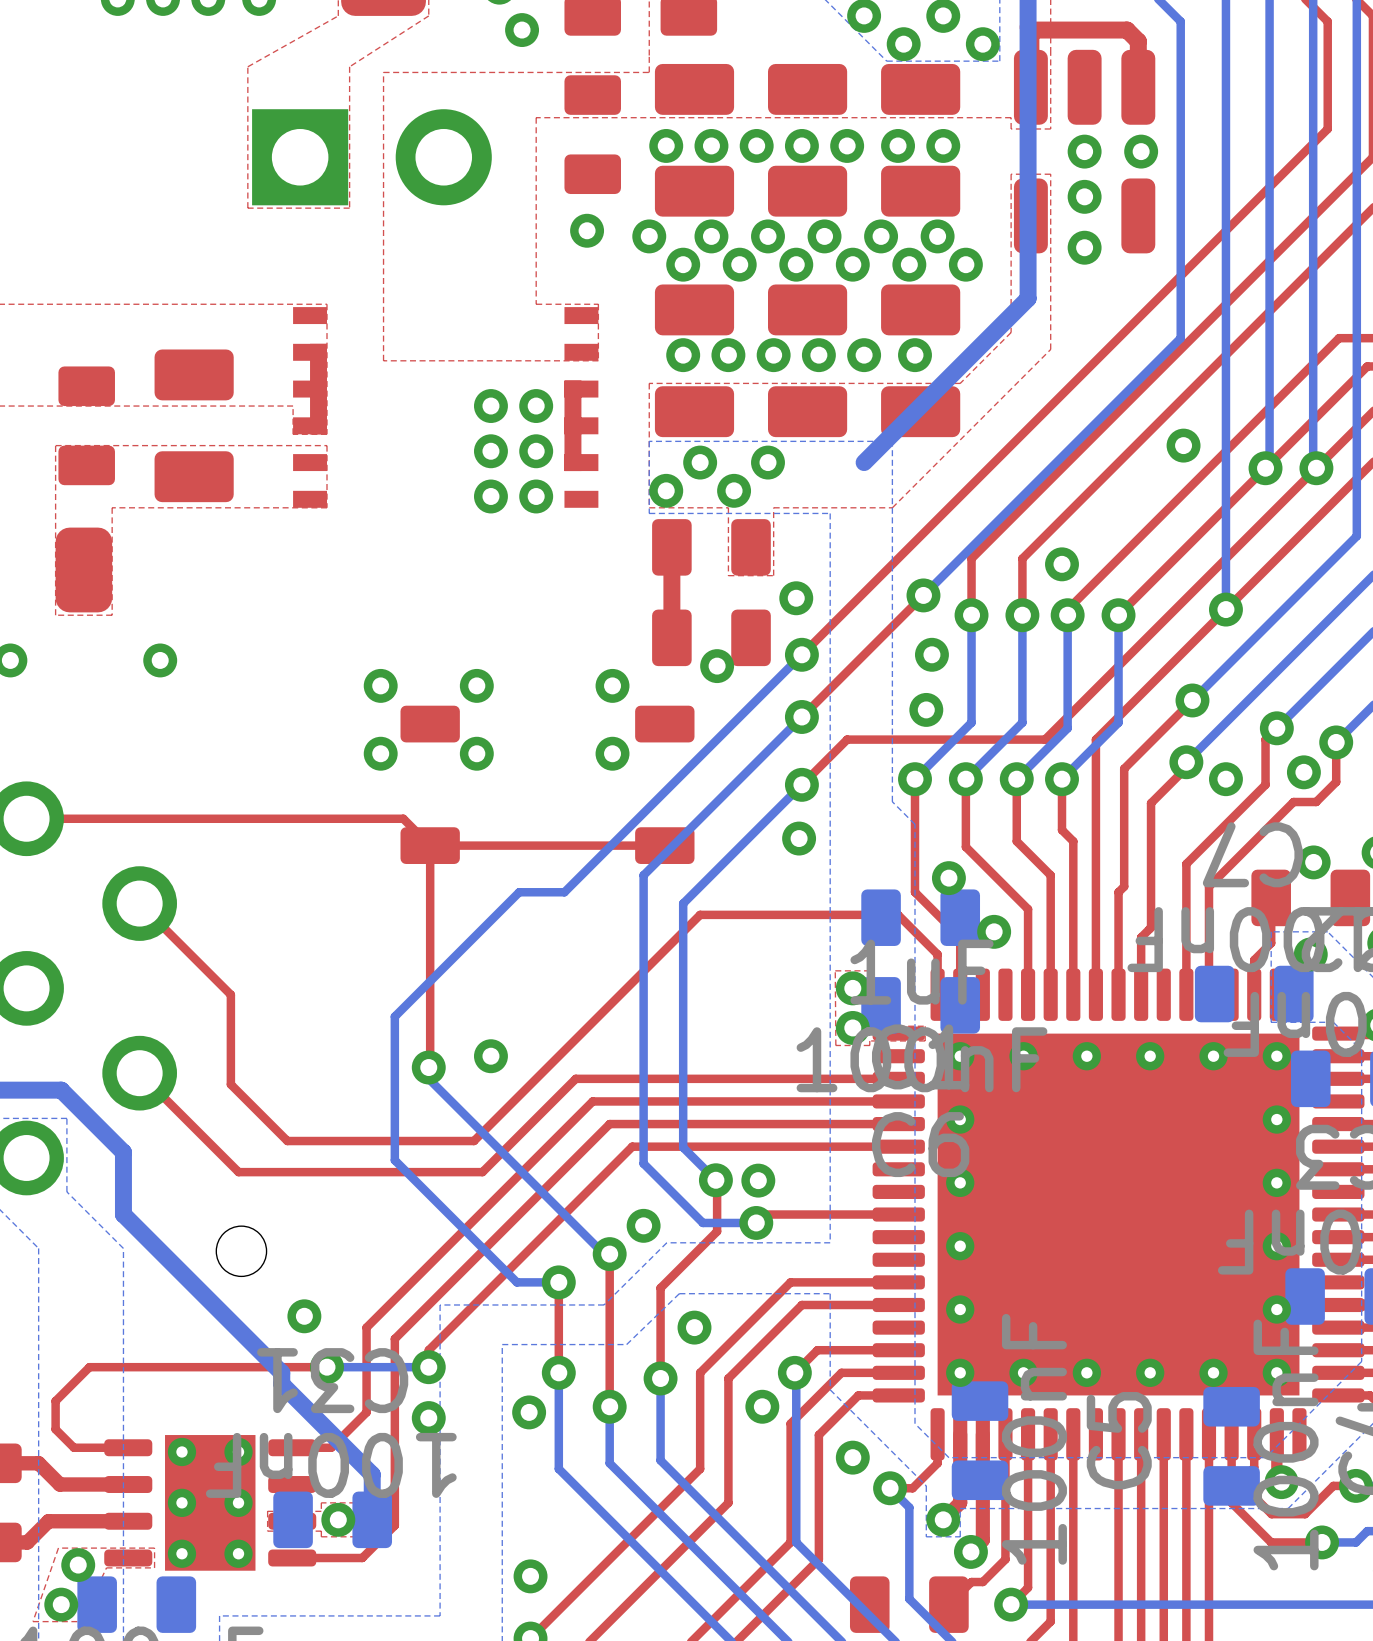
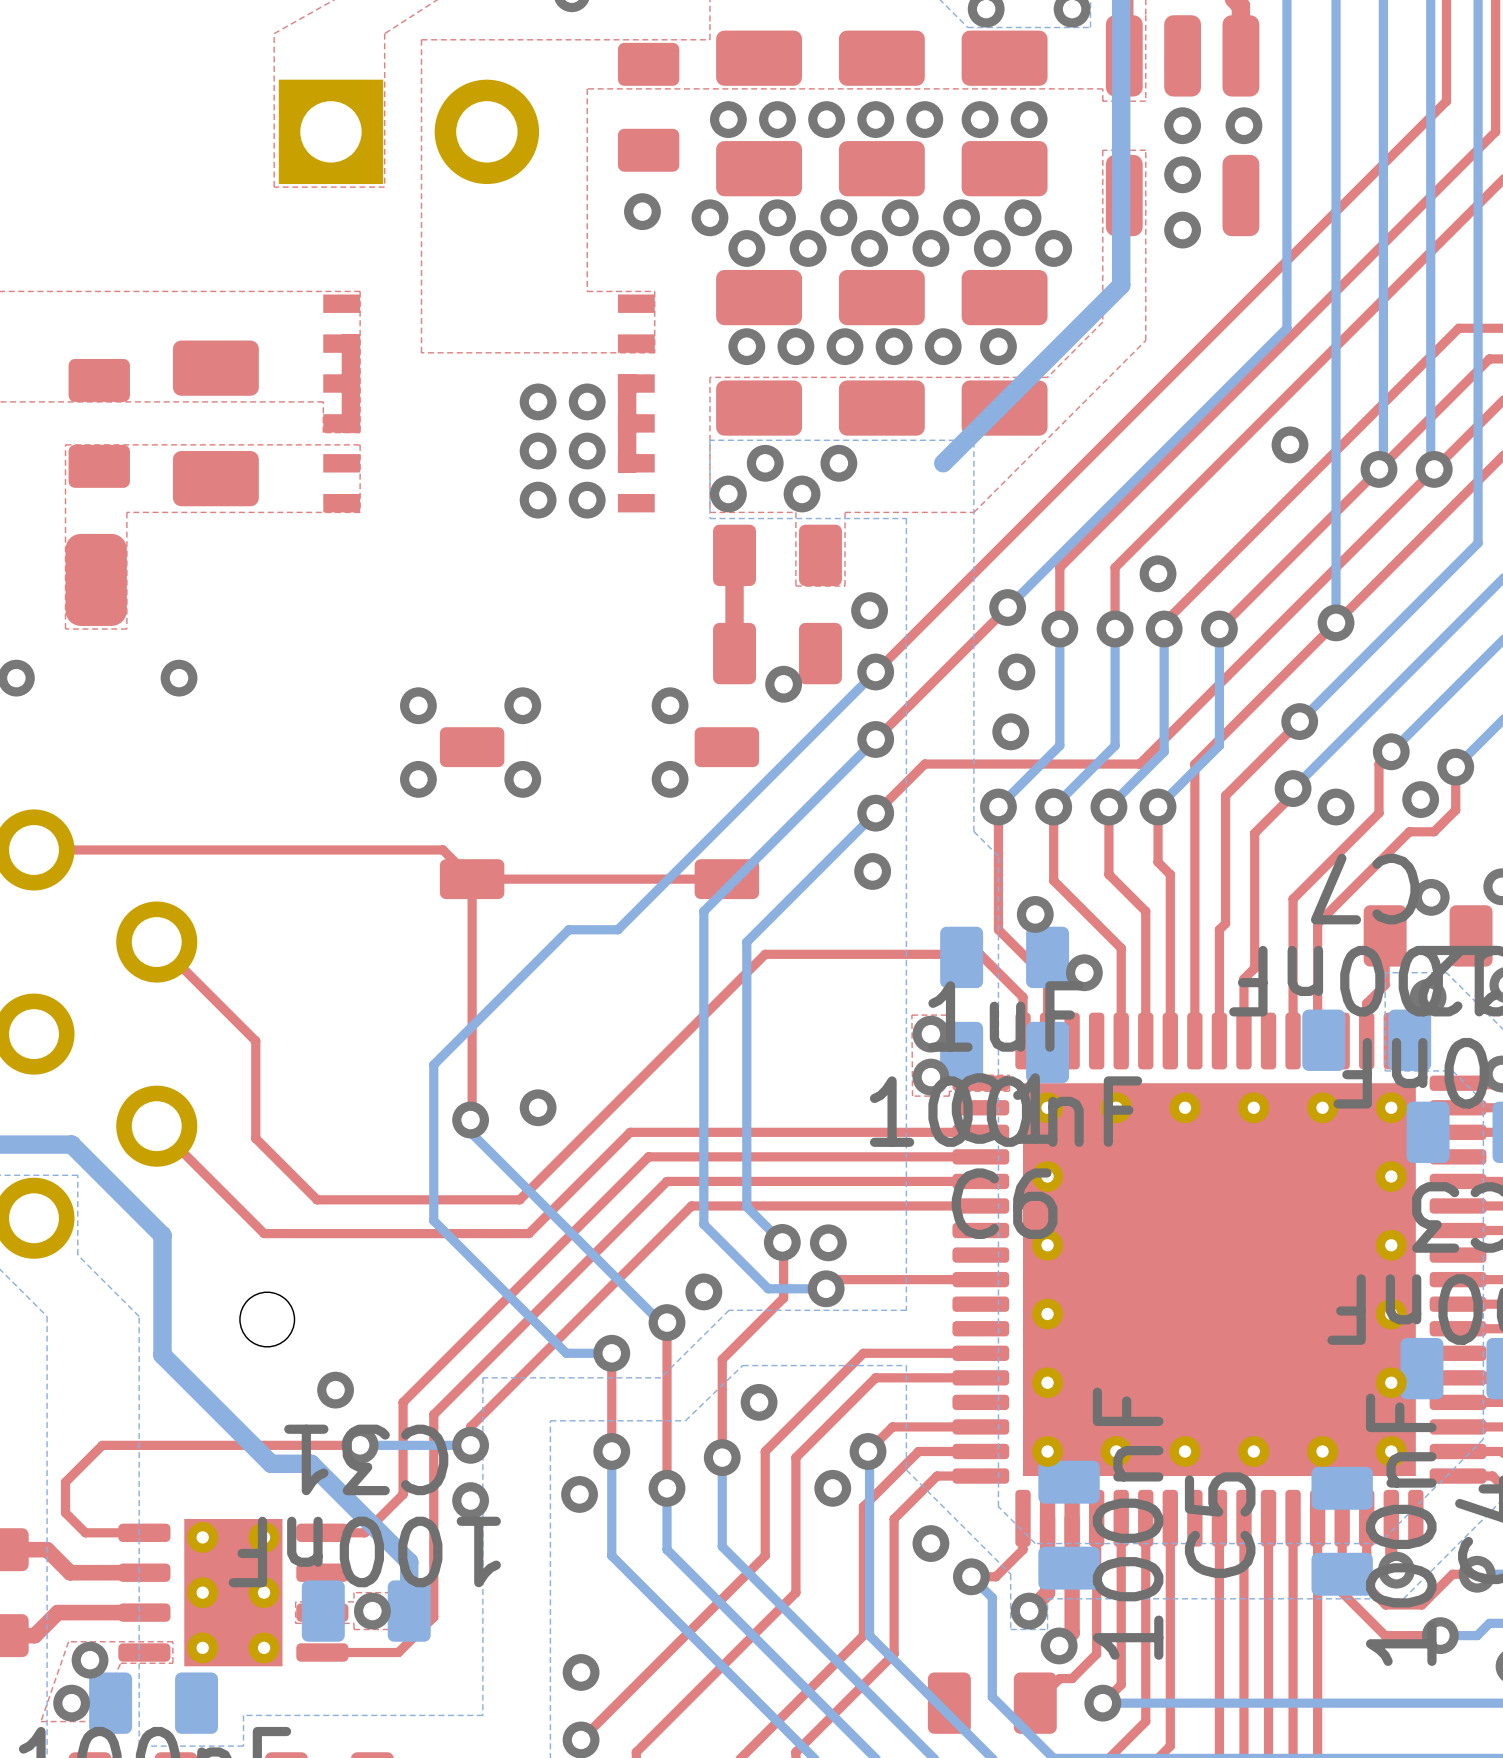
bottom track: (123, 1152) (123, 1214) (281, 1372) (281, 1384) -> (139, 1212) (162, 1235) (162, 1355) (271, 1463) (311, 1463)

